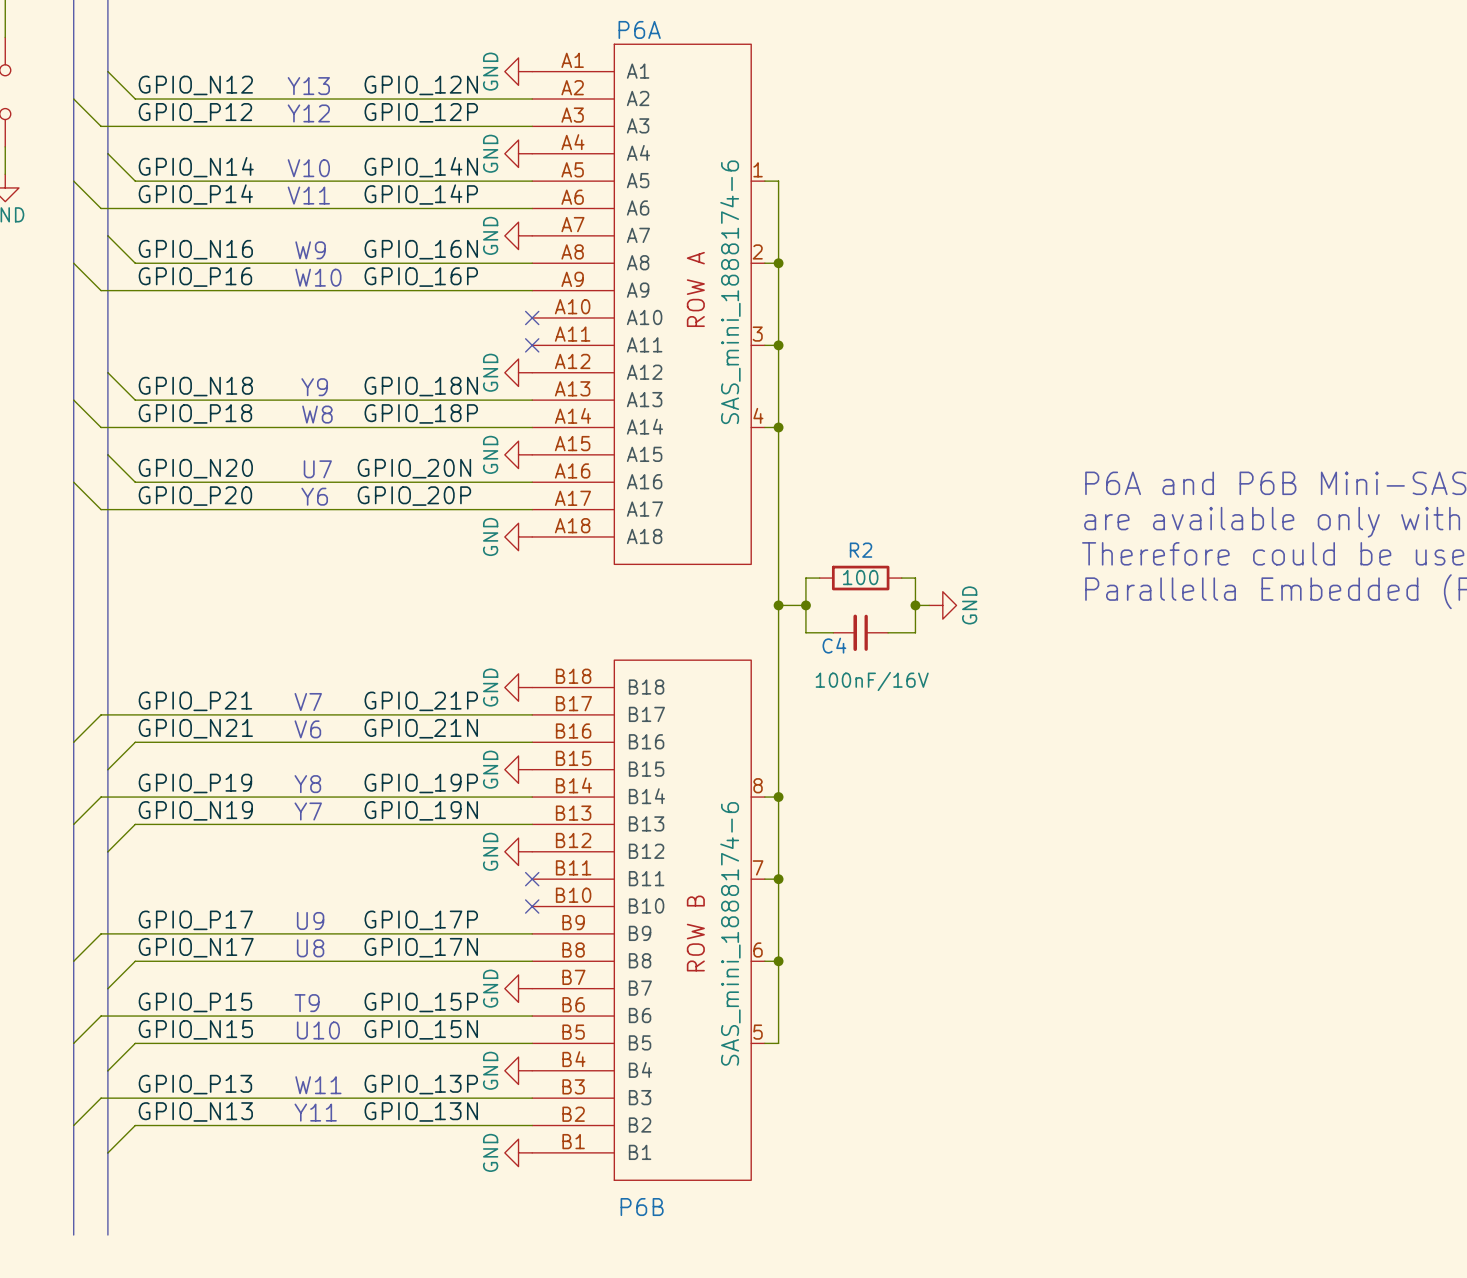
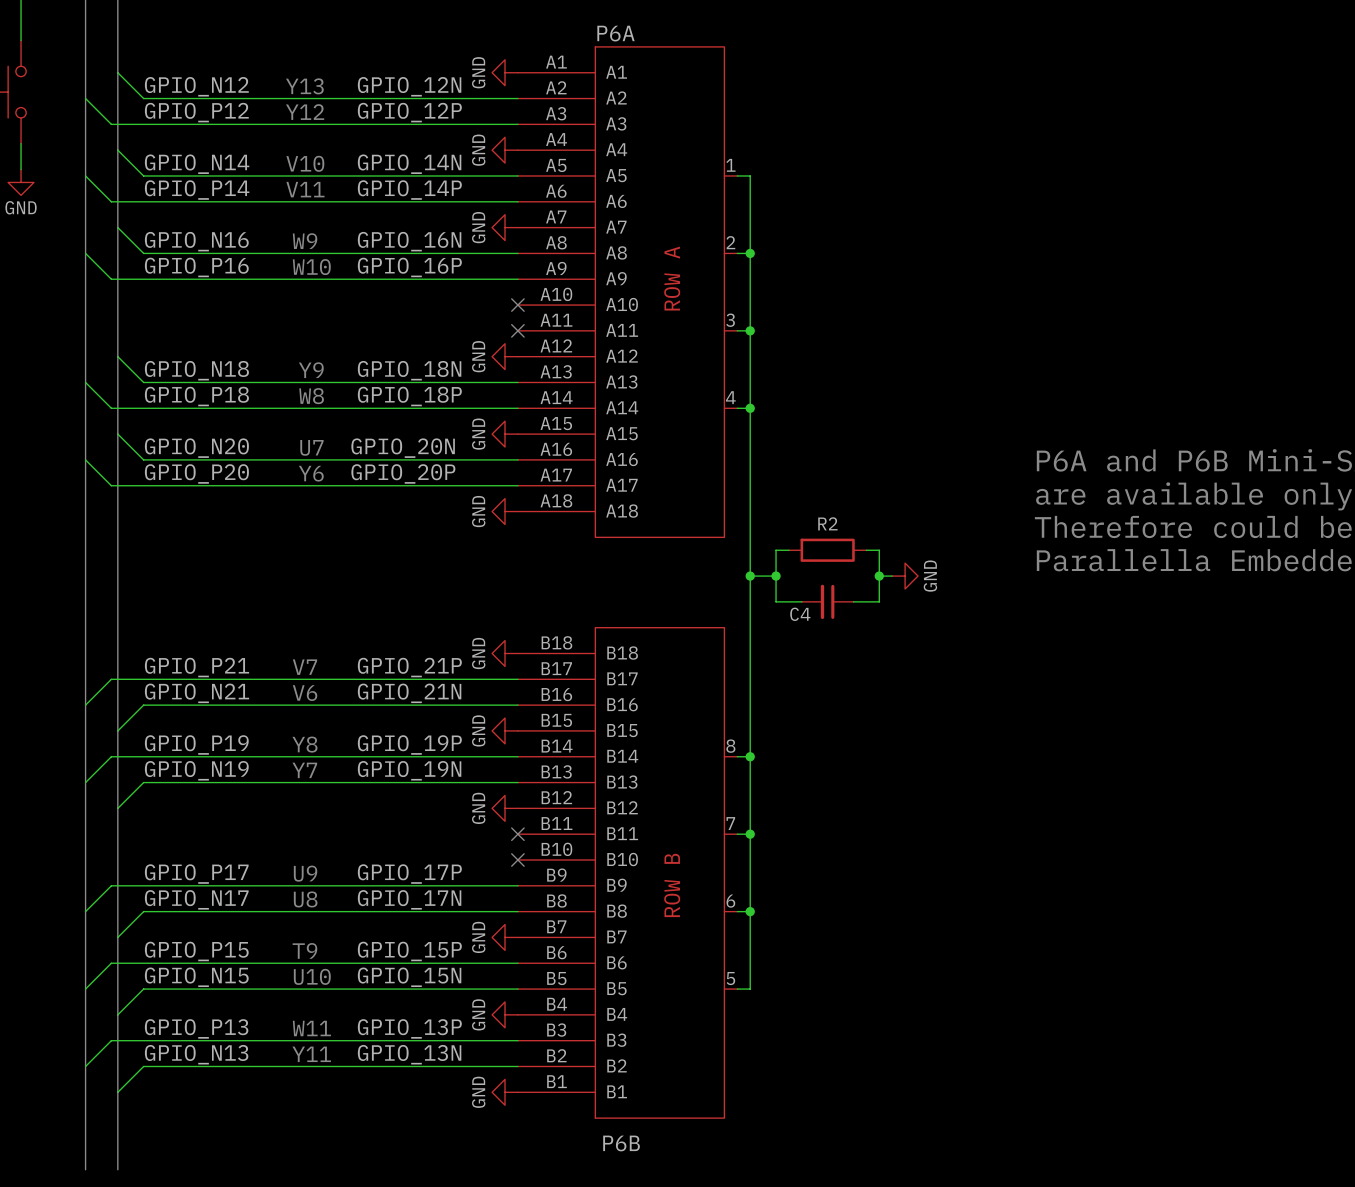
P6A value: SAS_mini_1888174-6 (730, 292) -> none
R2 value: 100 (860, 577) -> none
C4 value: 100nF/16V (872, 681) -> none
P6B value: SAS_mini_1888174-6 (730, 933) -> none

